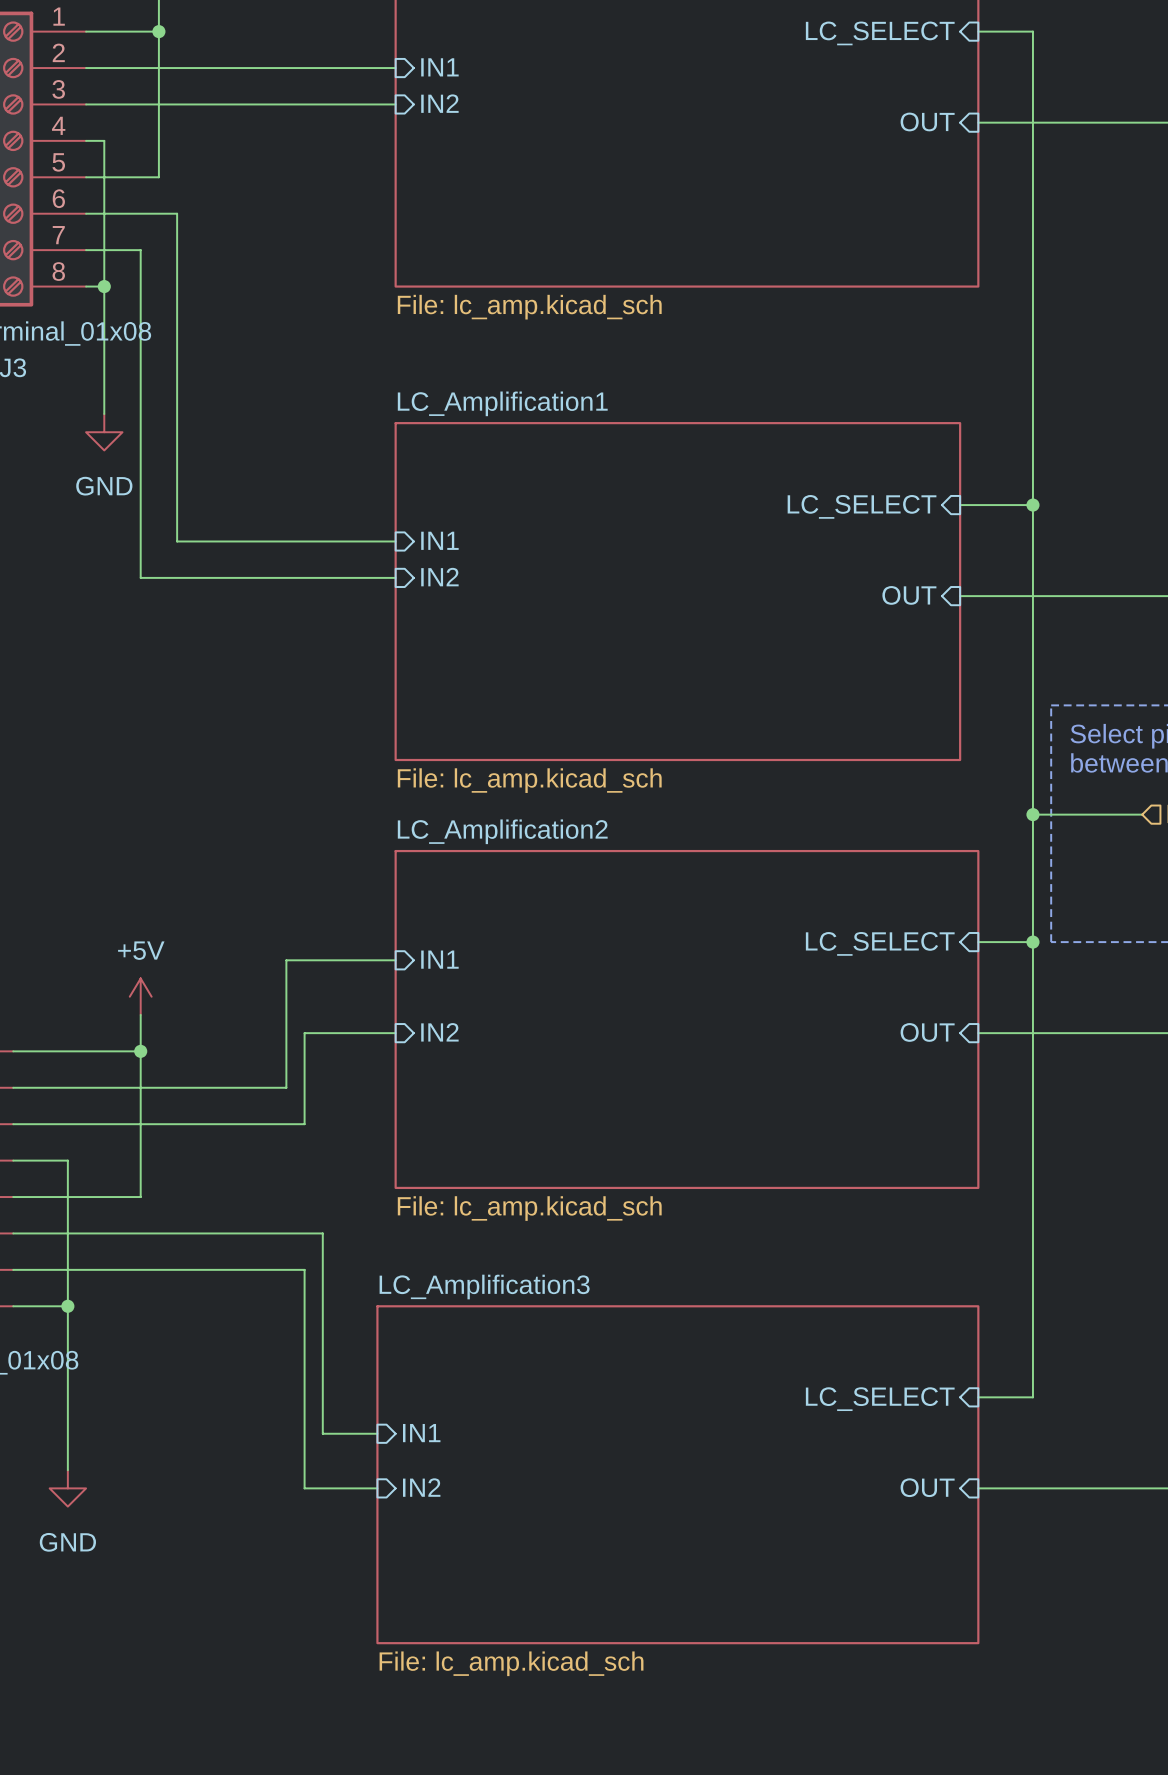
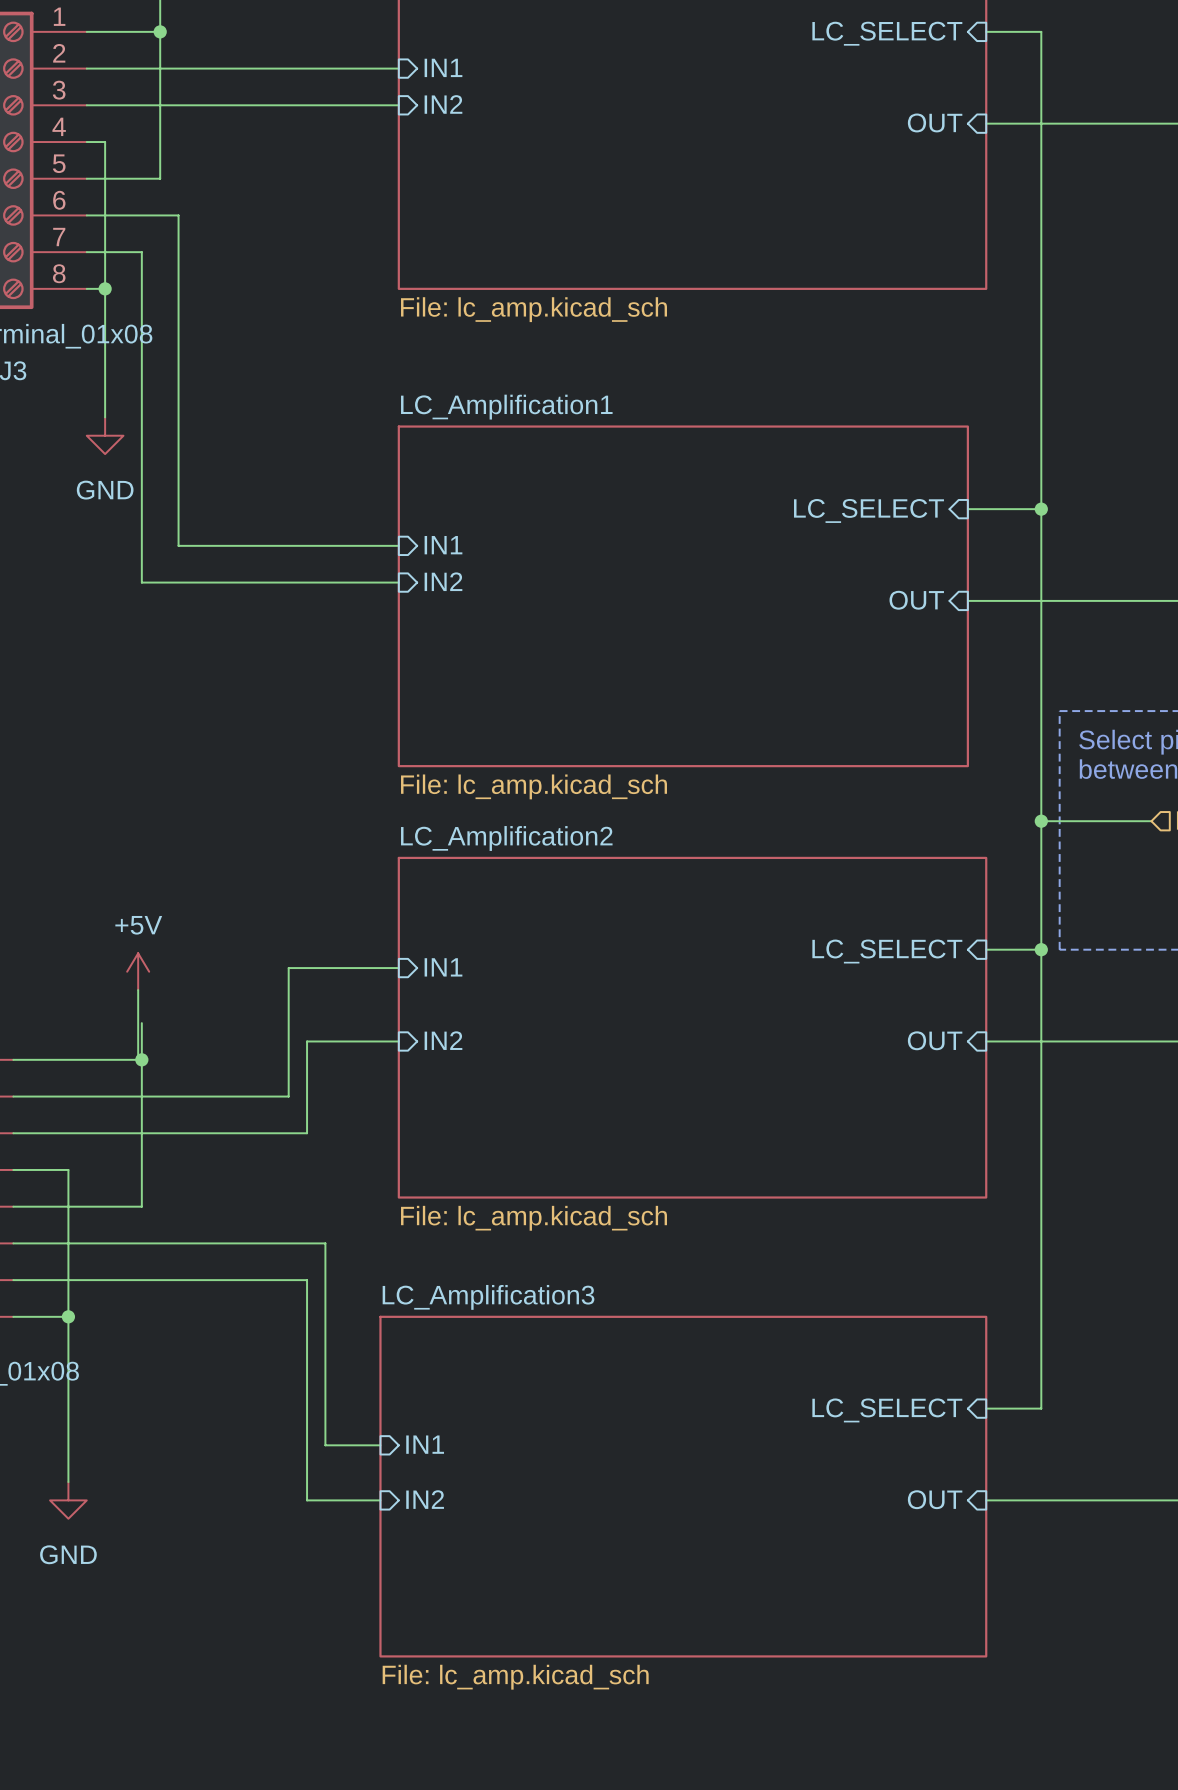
wire: none -> (138, 990) (138, 1059)
power symbol position: +5V (140, 996) -> +5V (138, 971)

